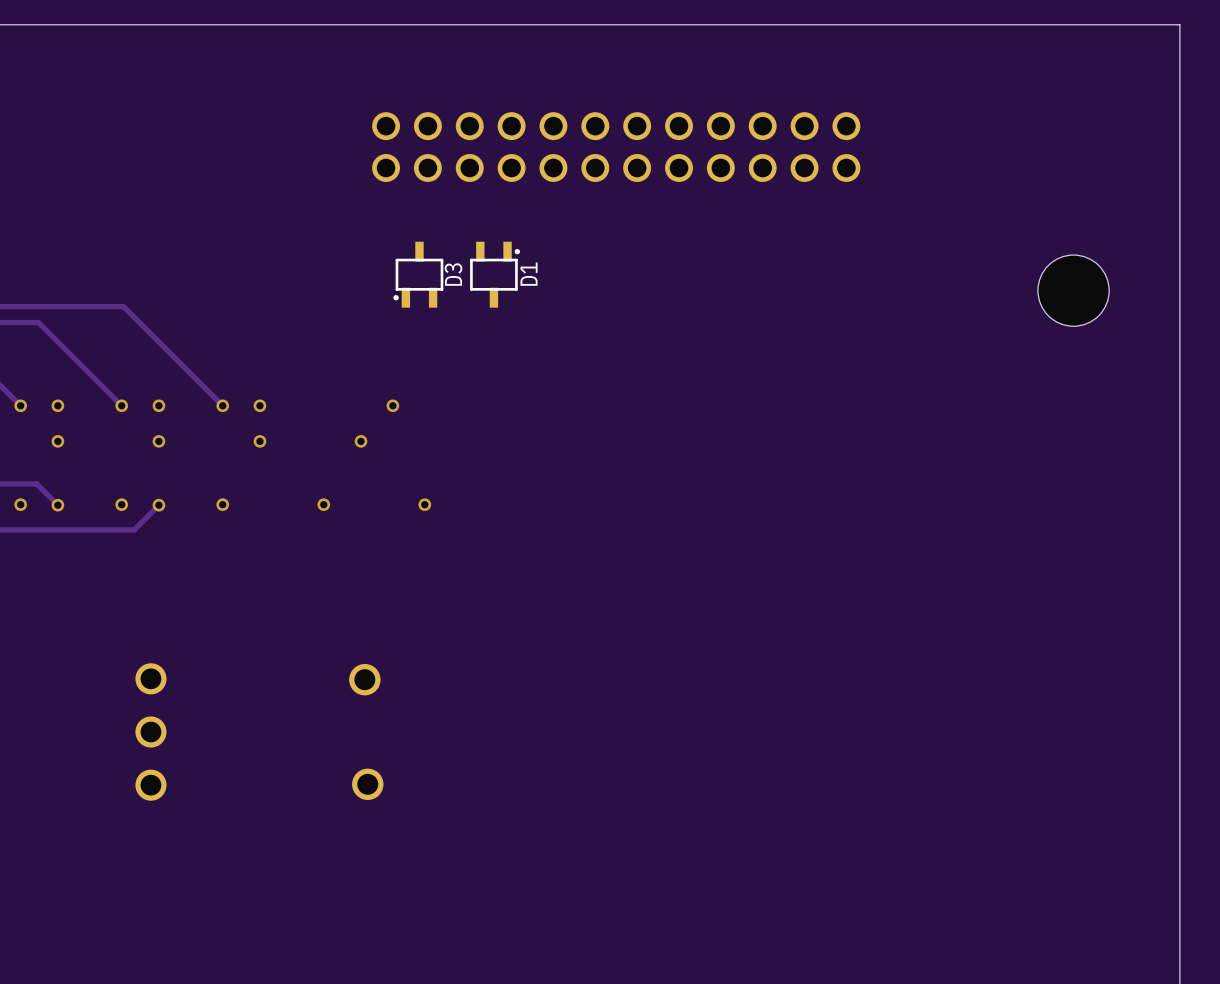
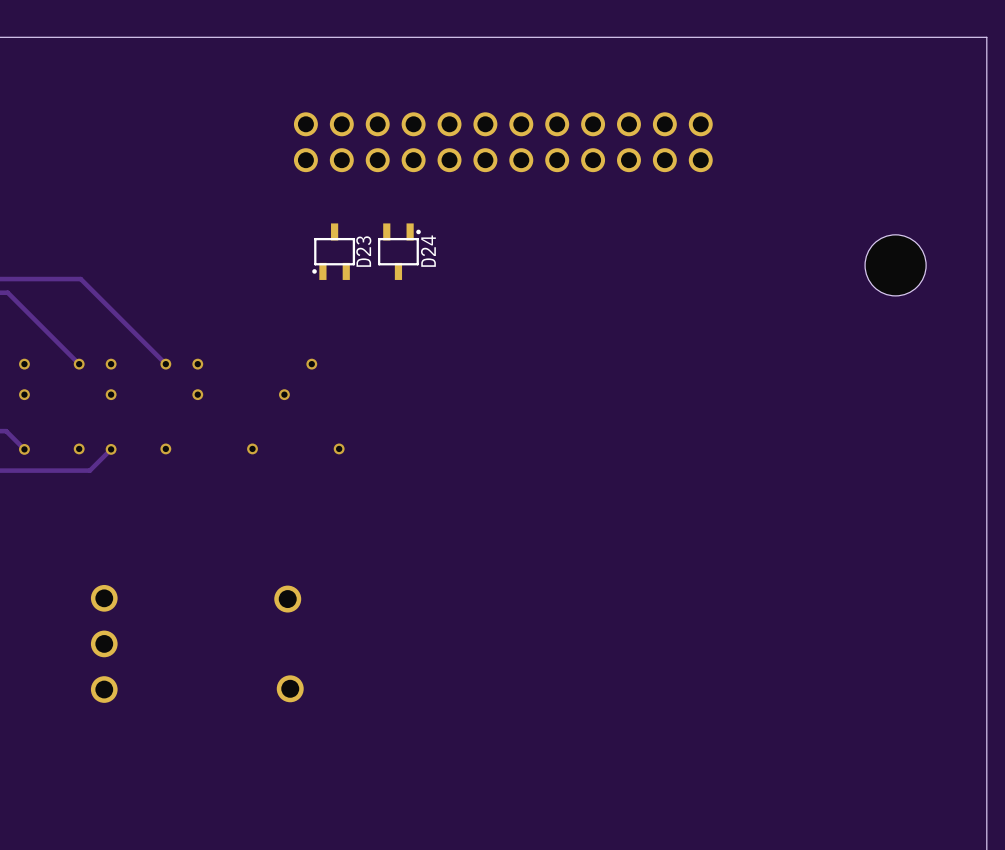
D3 name: D3 (453, 274) -> D23 (363, 251)
D1 name: D1 (529, 274) -> D24 (428, 251)

